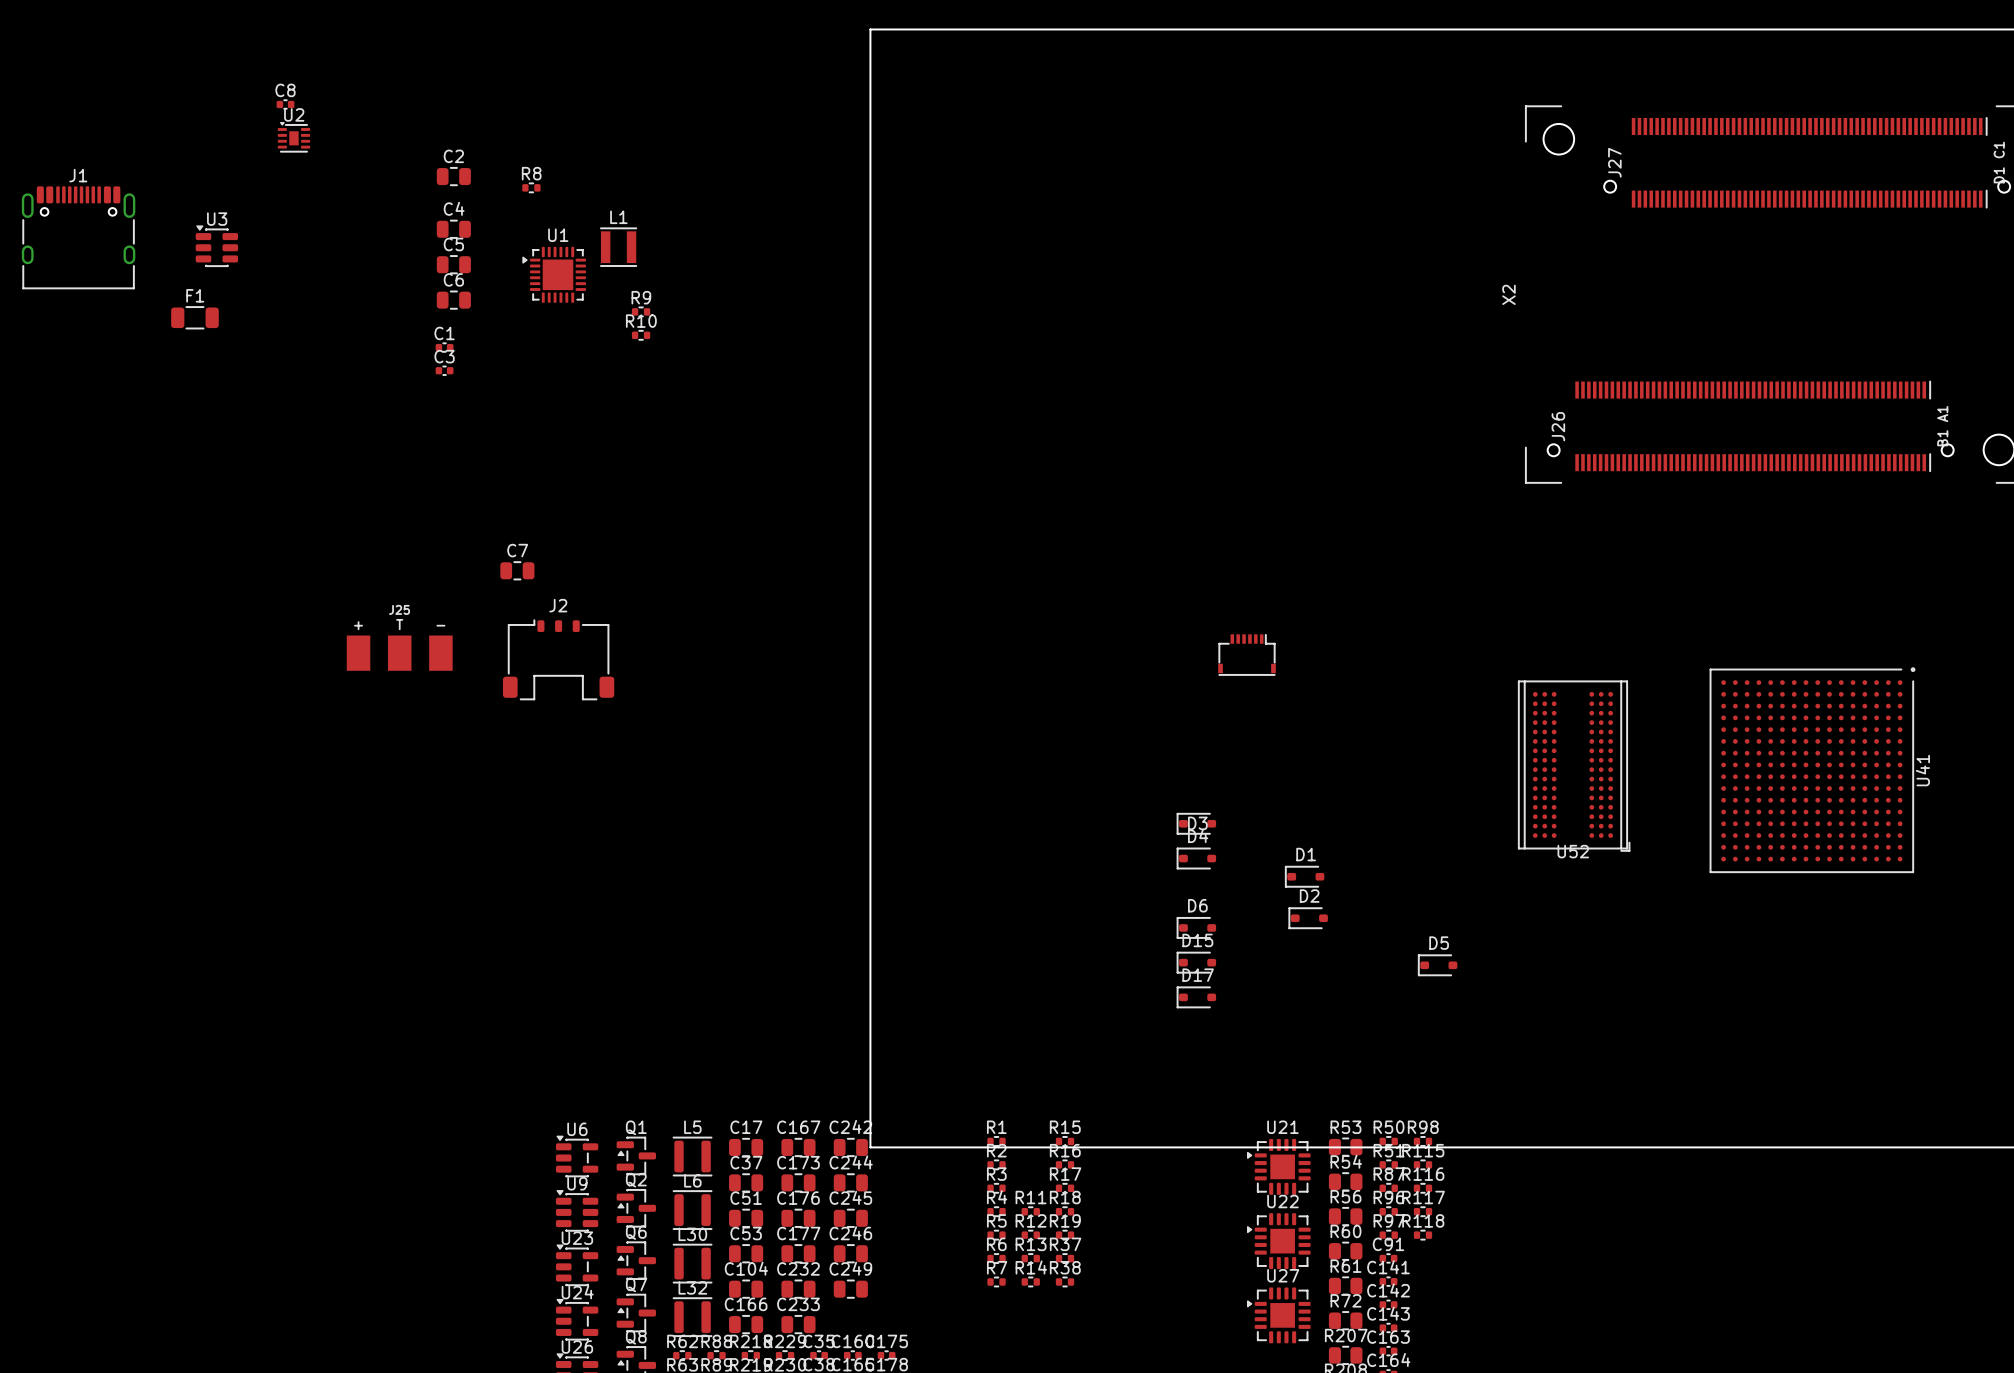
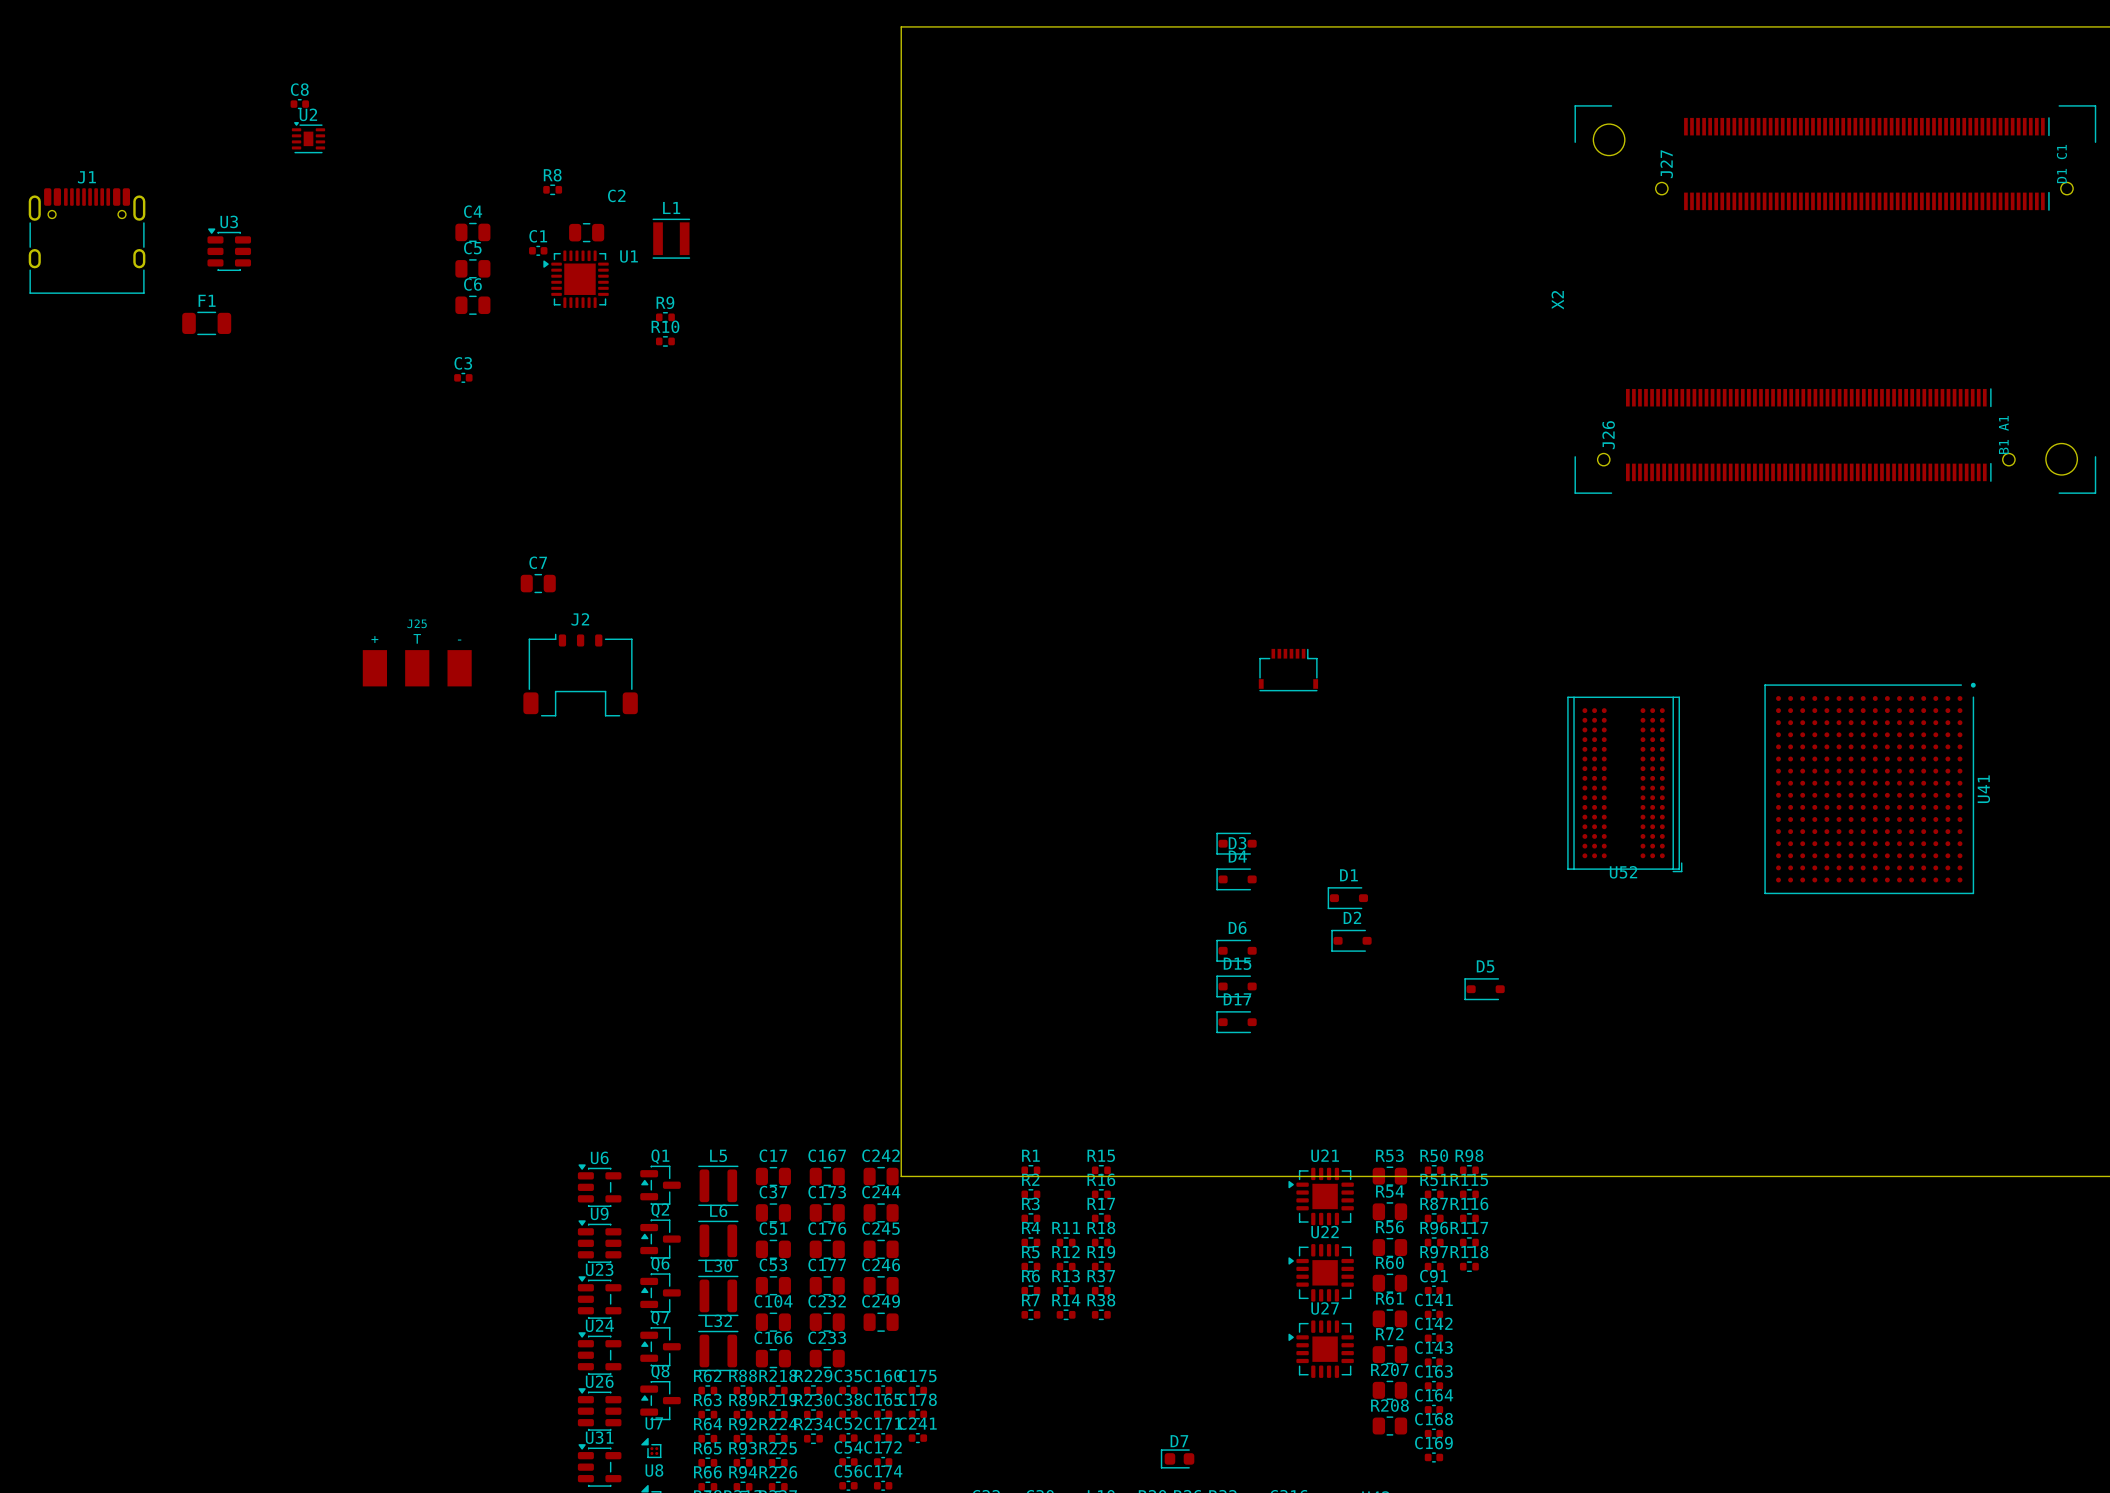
C2 name position: C2 (453, 156) -> C2 (616, 195)
C2 position: (453, 176) -> (586, 232)
U1 name position: U1 (558, 235) -> U1 (629, 256)
L1 position: (618, 247) -> (671, 238)
C1 position: (444, 347) -> (538, 250)

